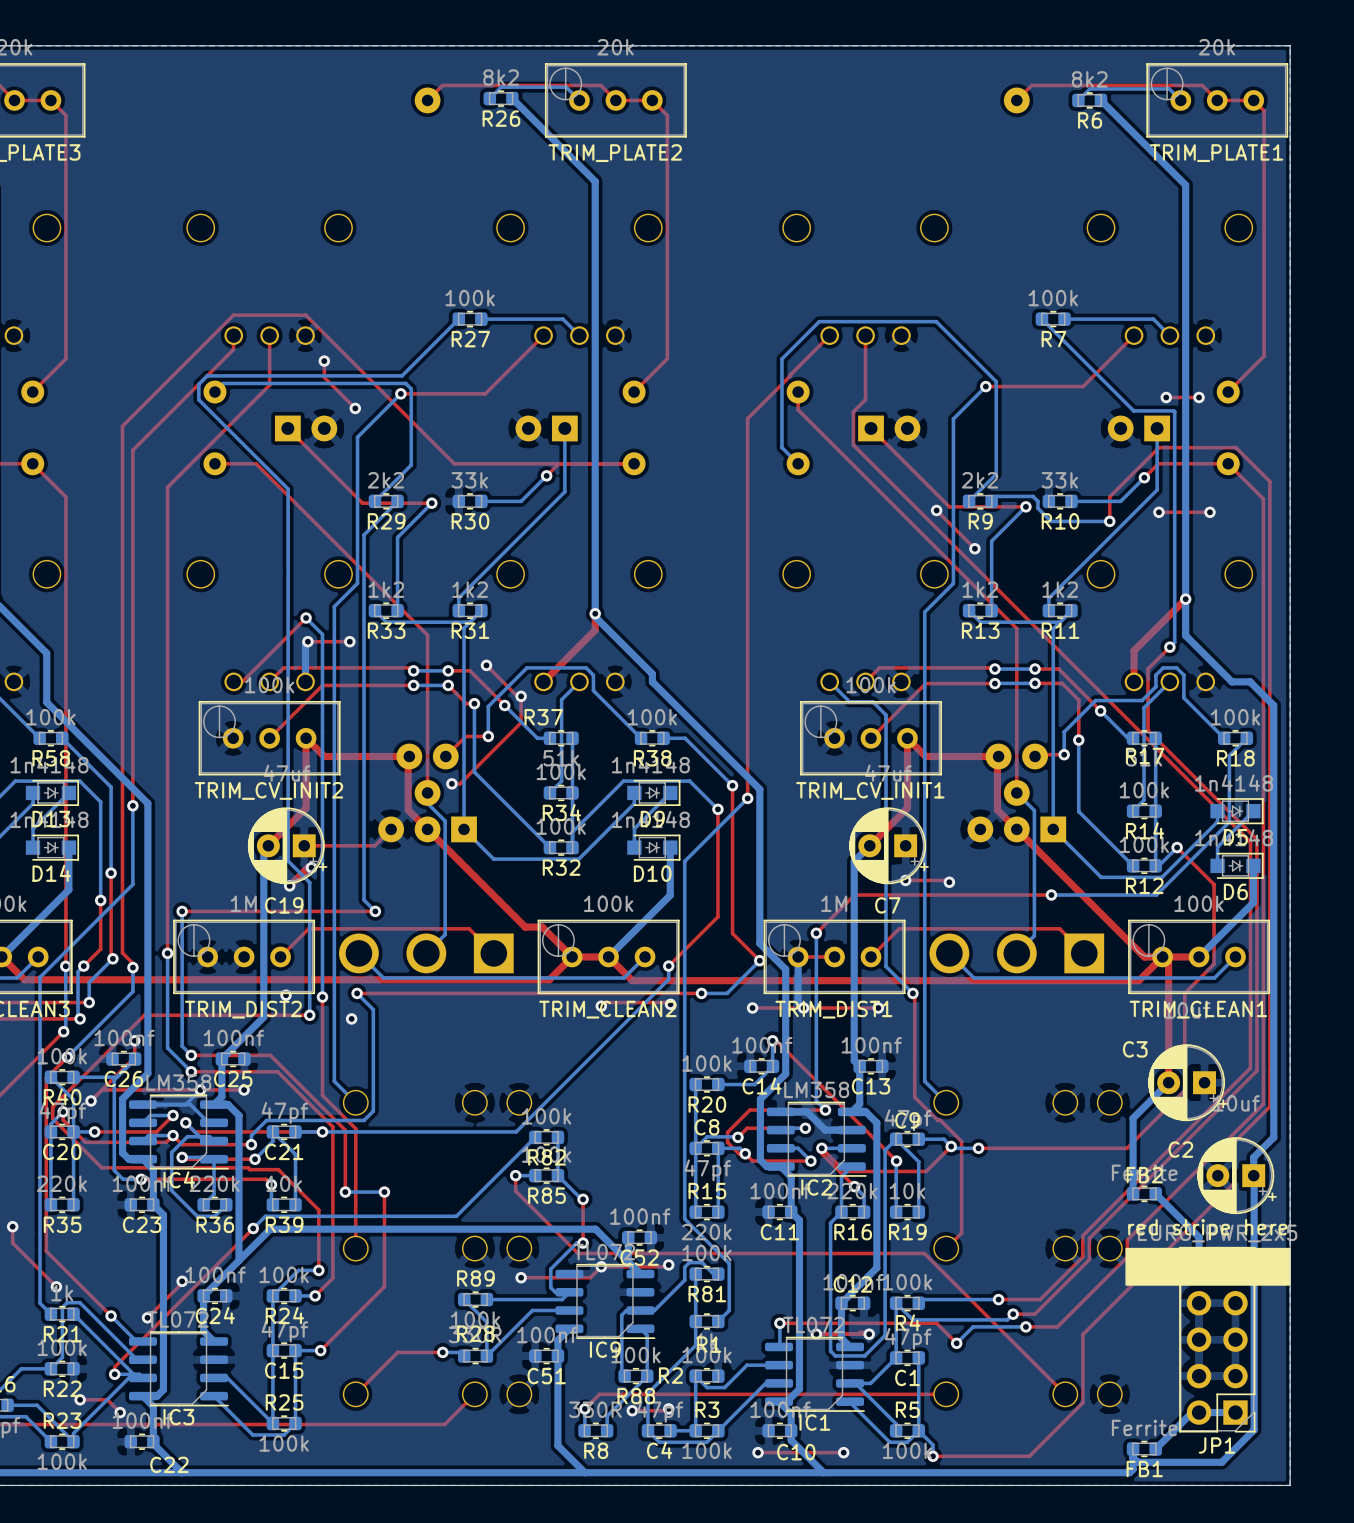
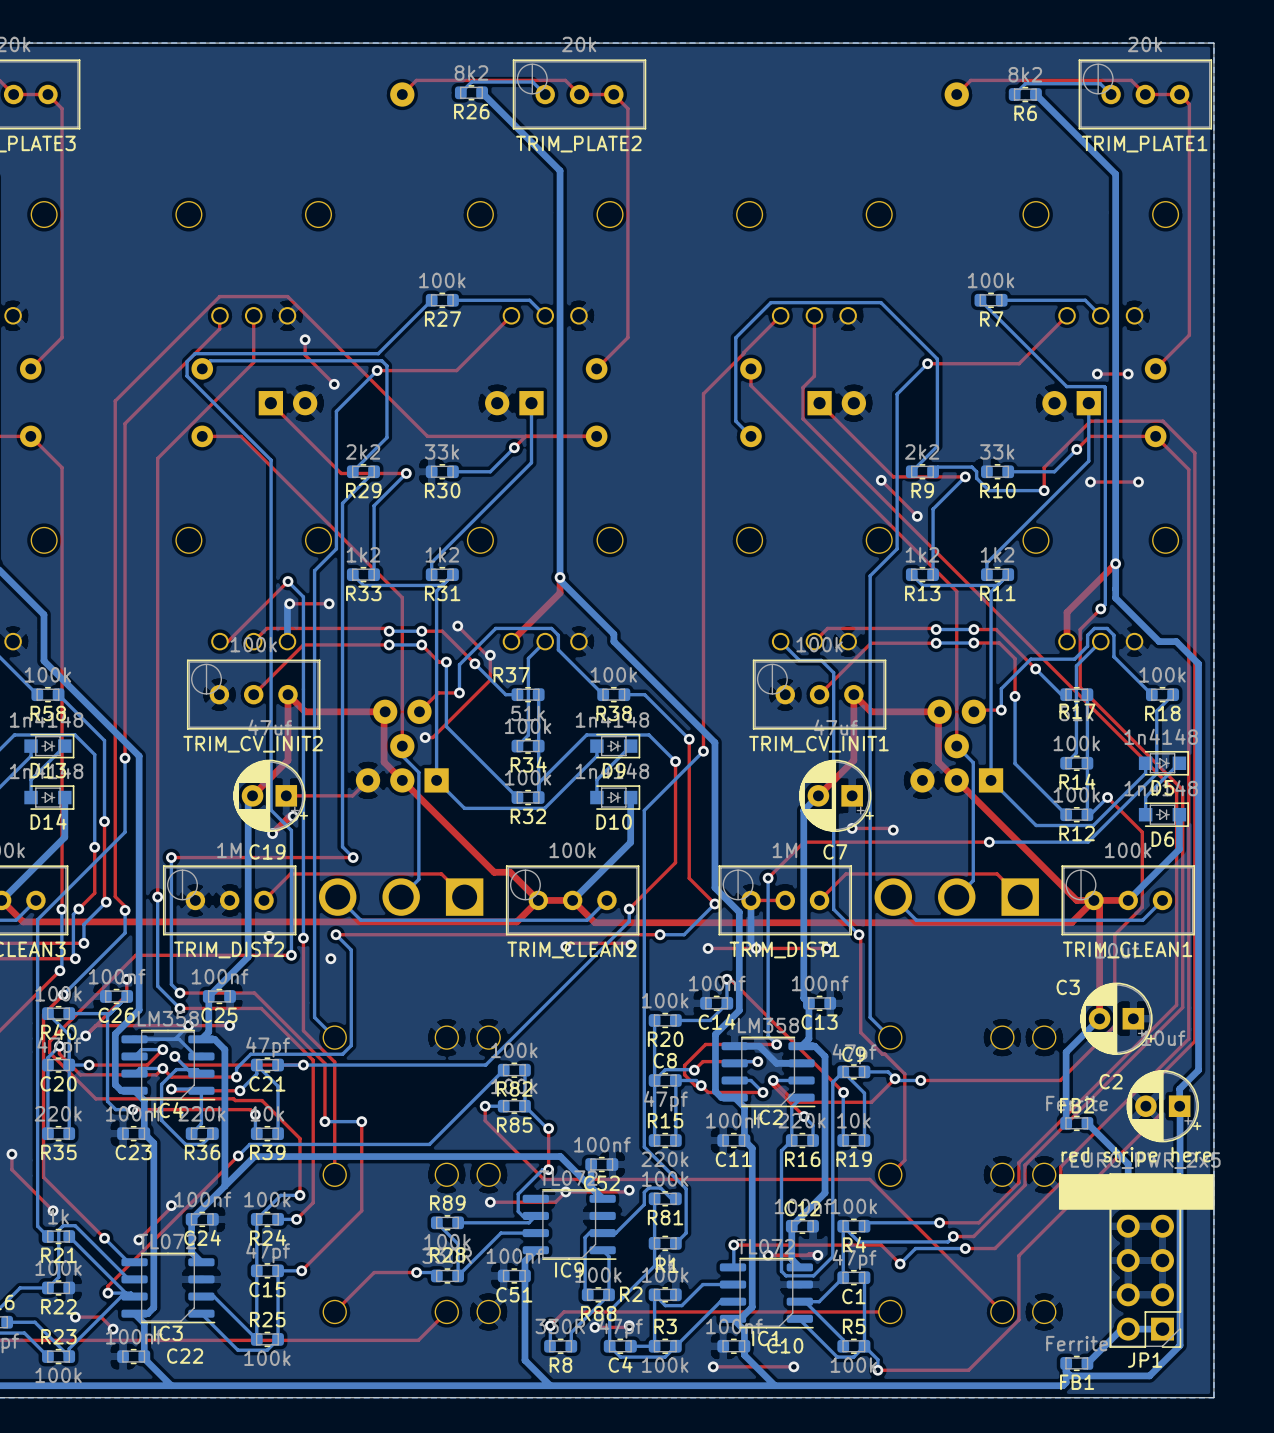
C10 name position: C10 (796, 1452) -> C10 (785, 1345)
C22 name position: C22 (169, 1464) -> C22 (185, 1356)

